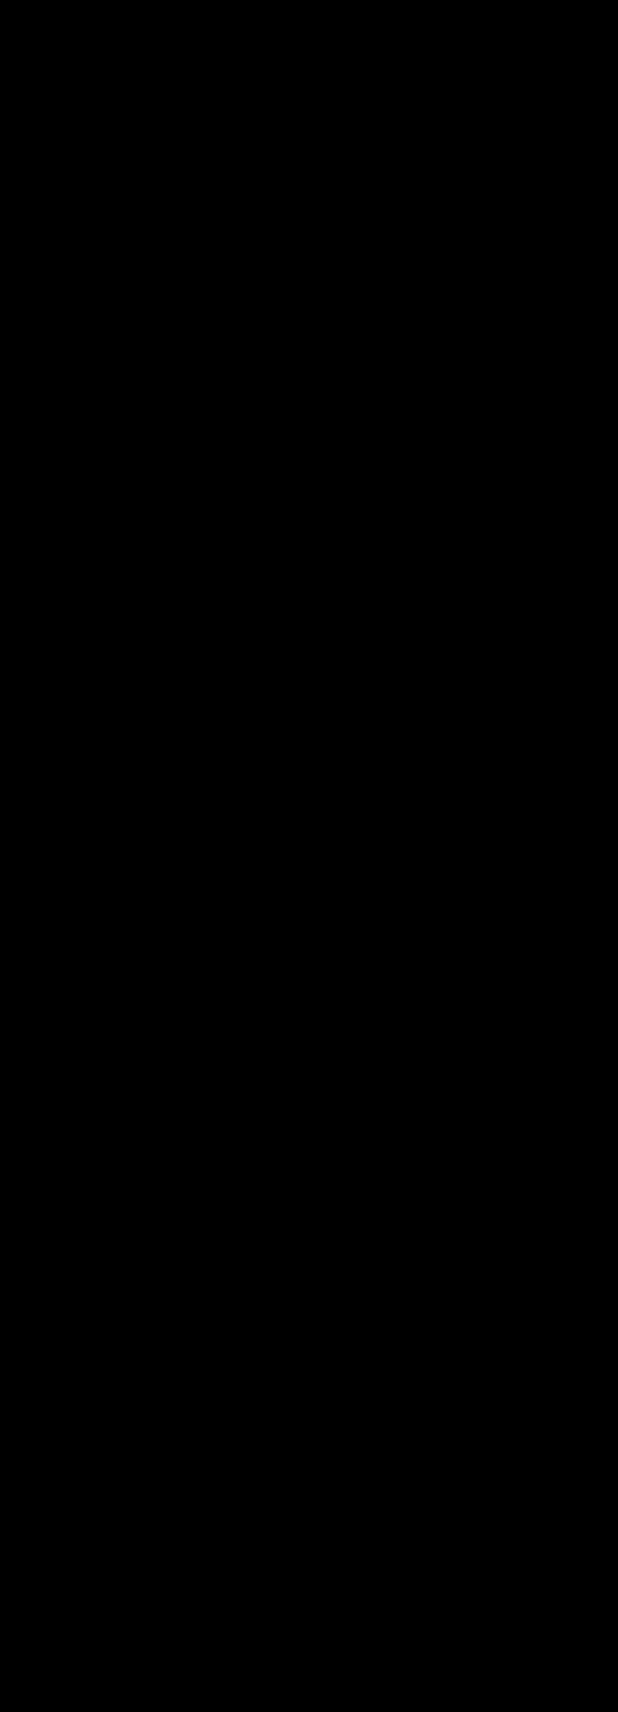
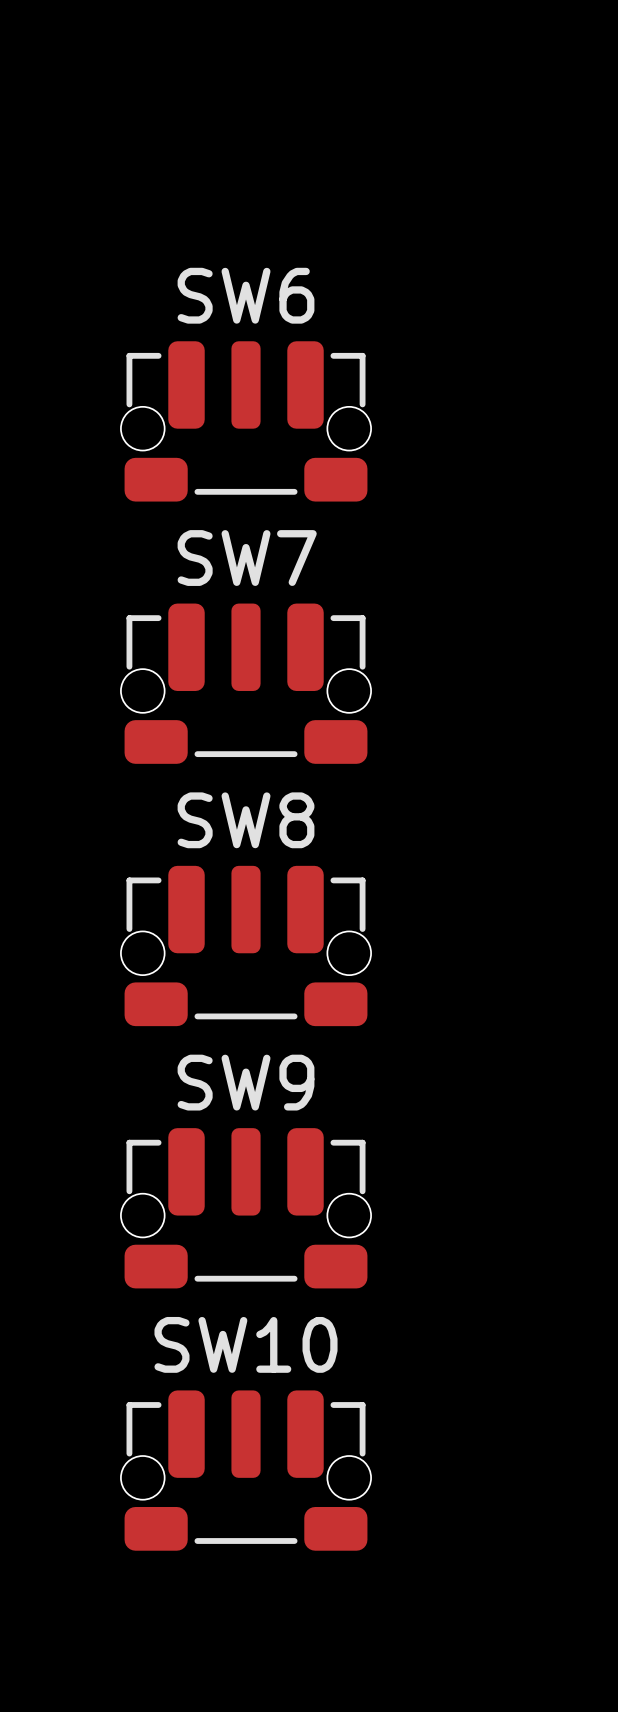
SW6: none -> (246, 421)
SW7: none -> (246, 683)
SW8: none -> (246, 945)
SW9: none -> (246, 1208)
SW10: none -> (246, 1470)

